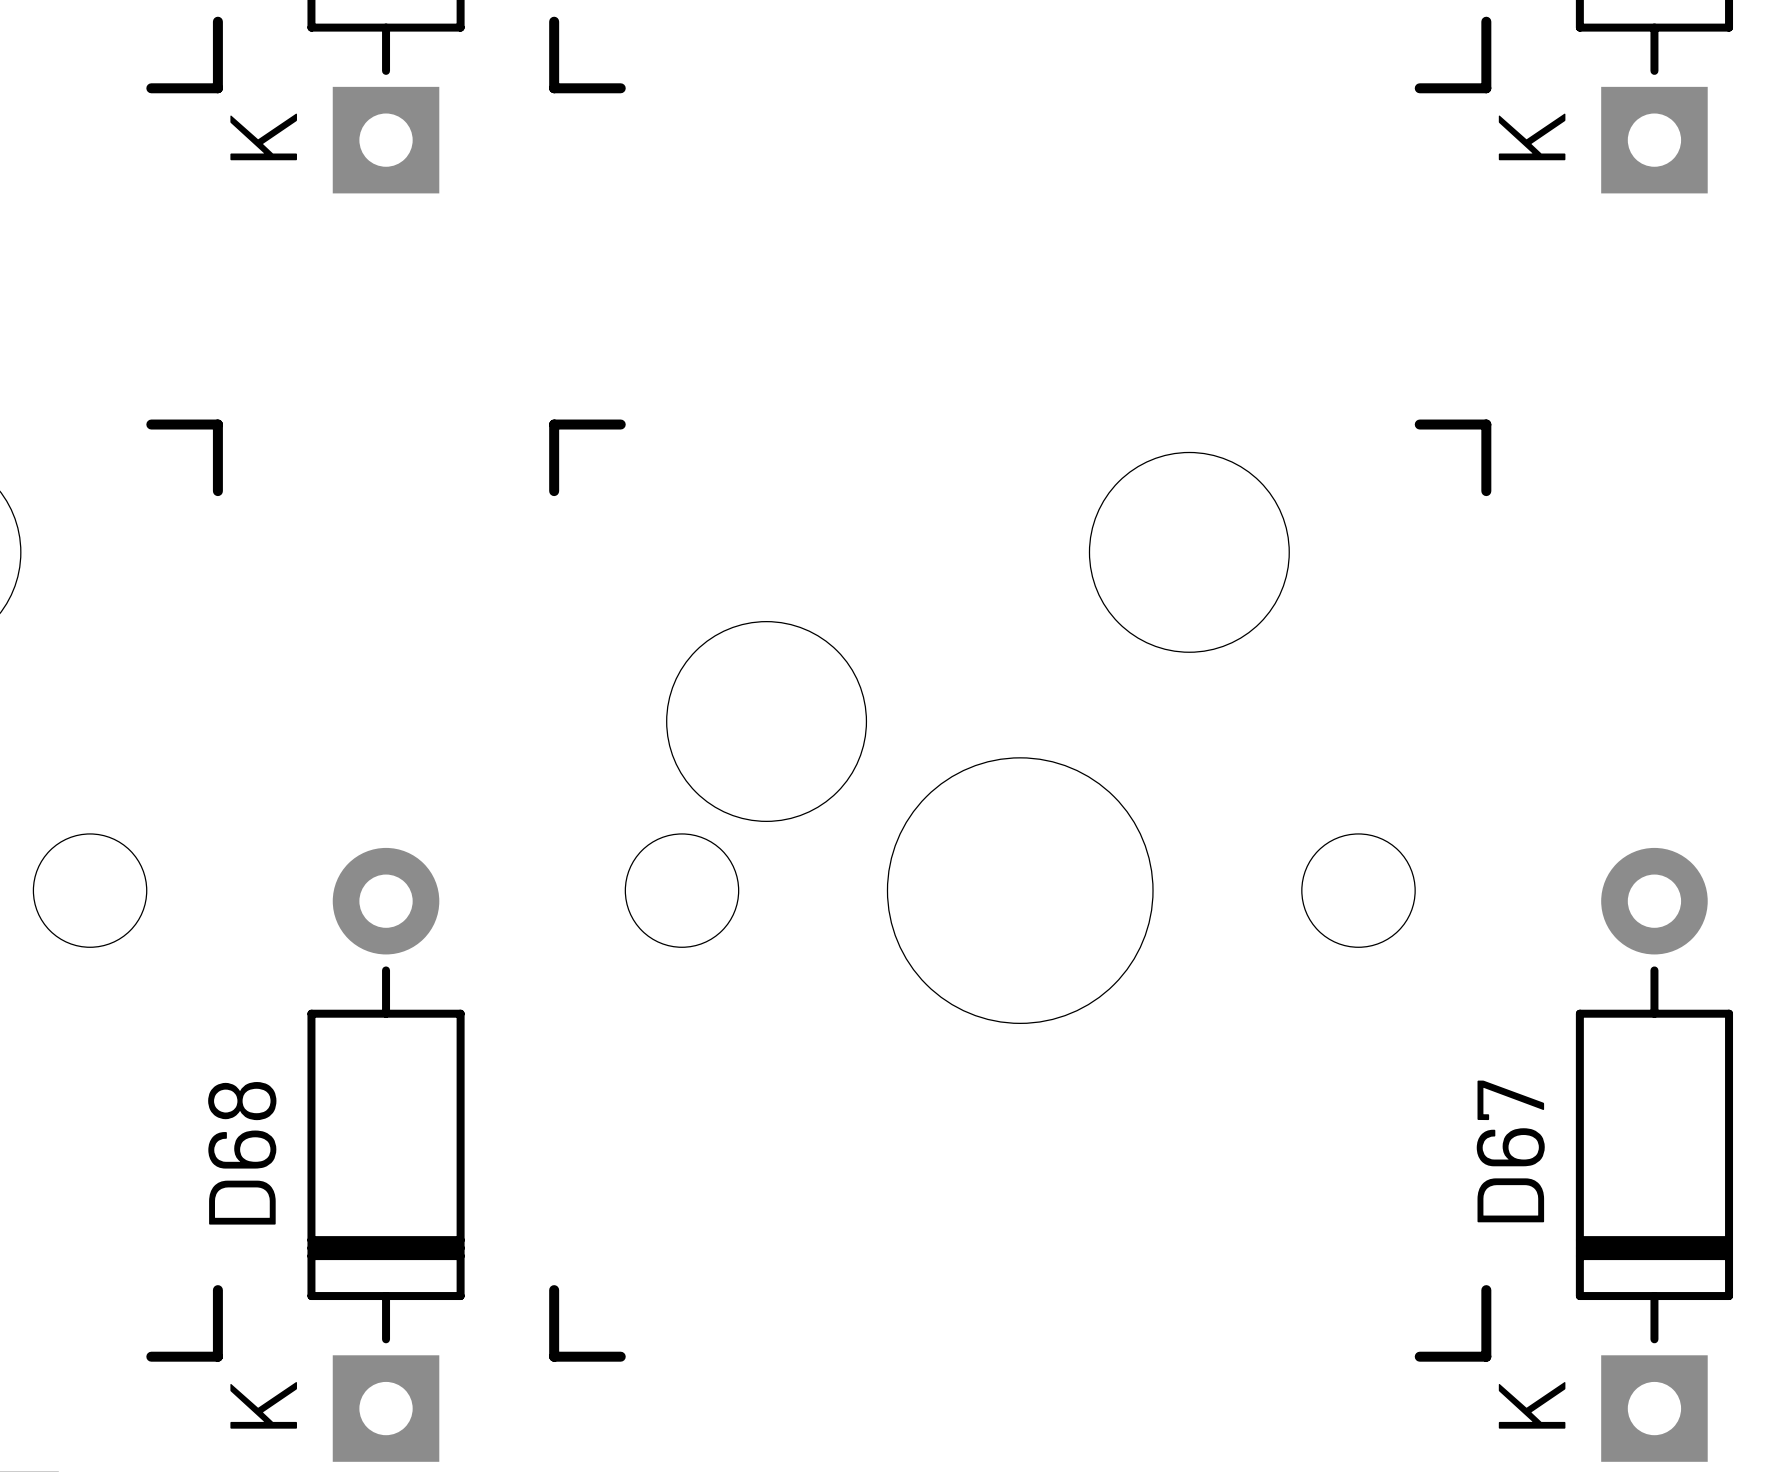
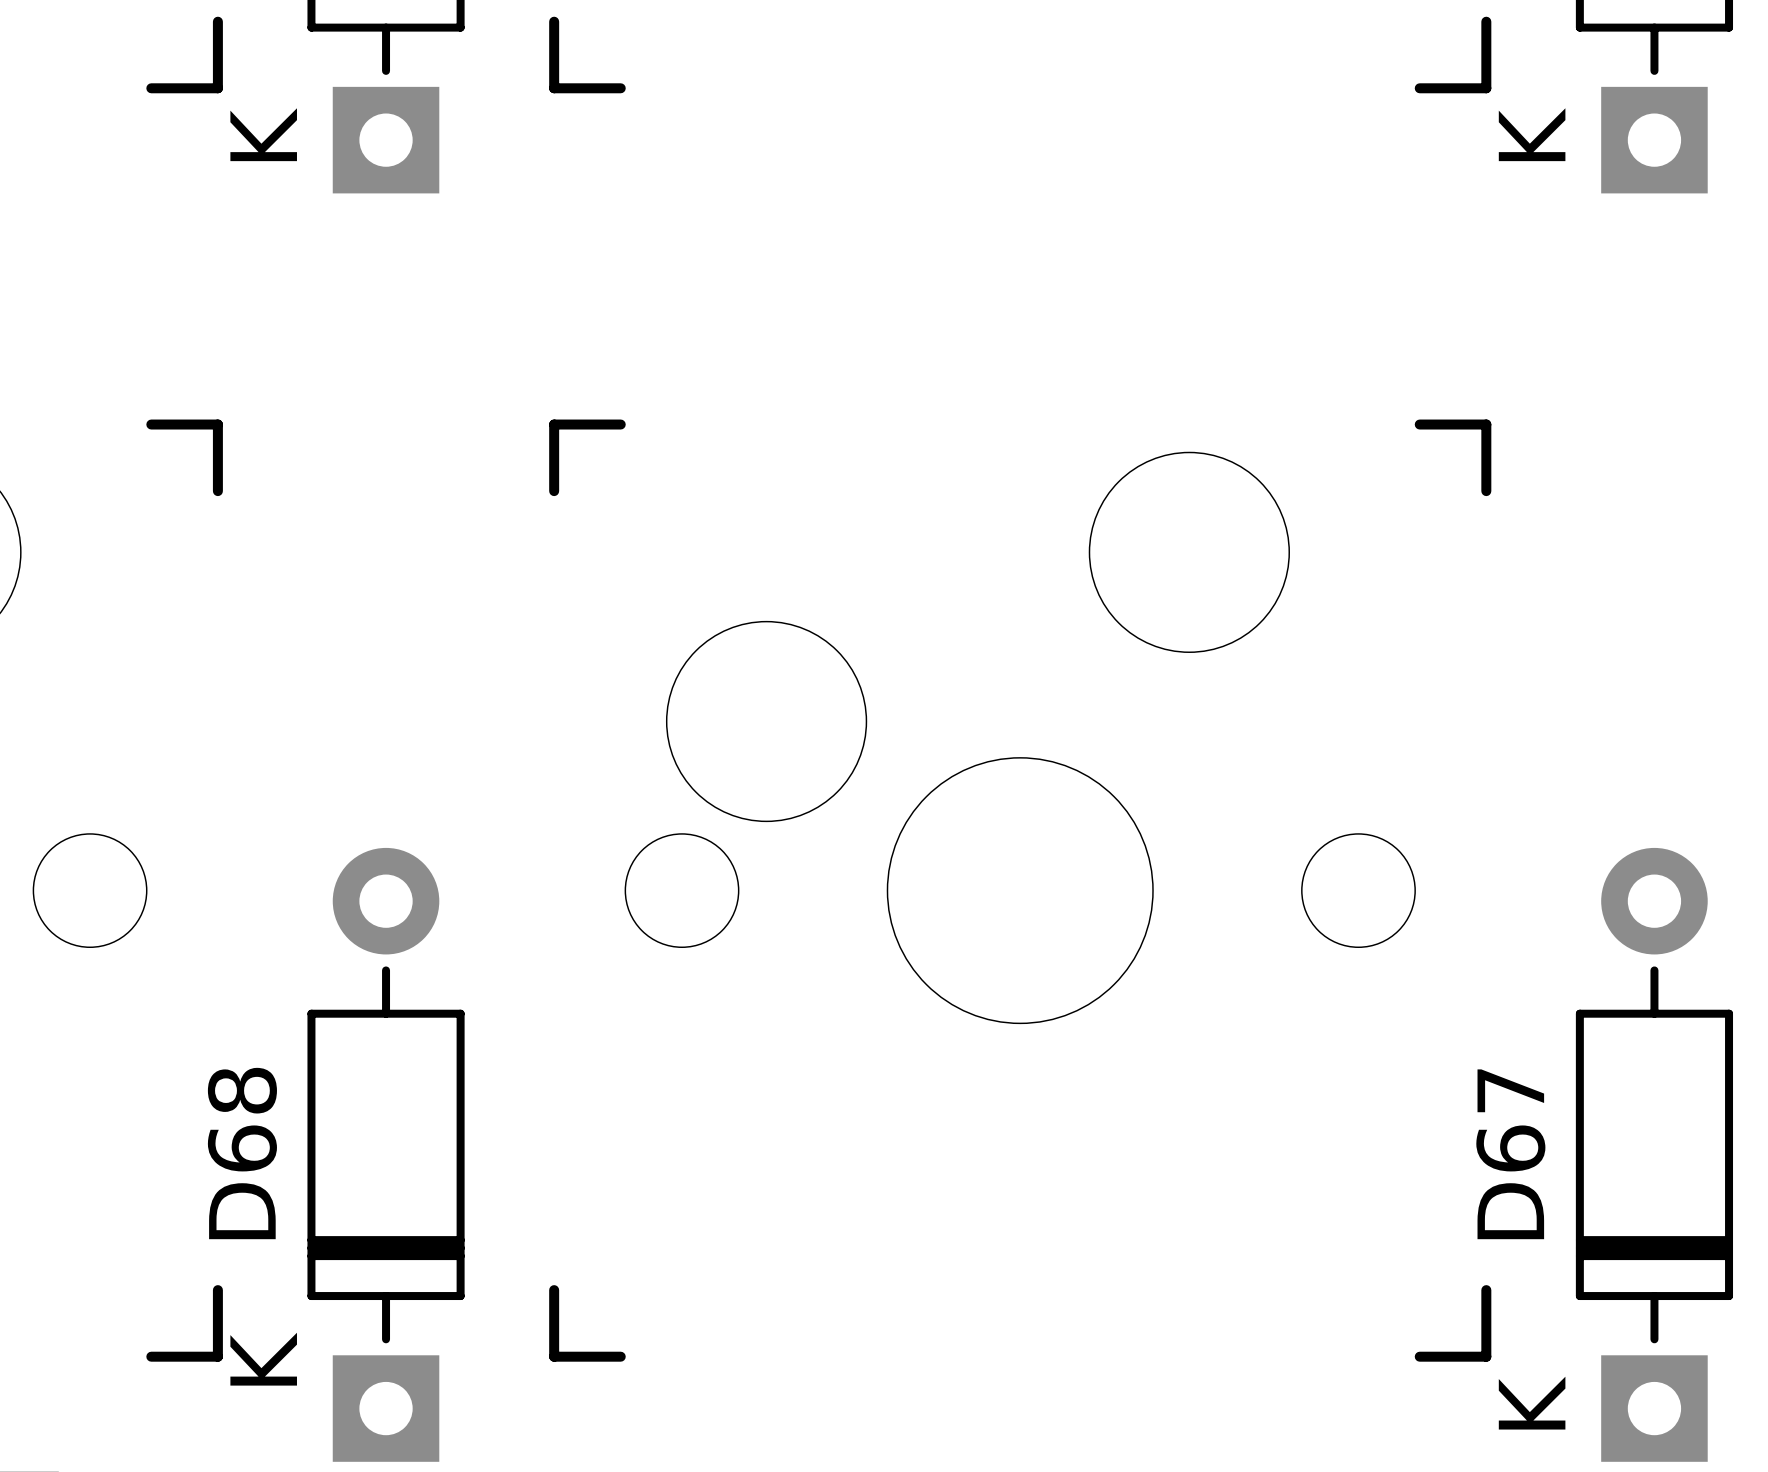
D68 text position: K (263, 1405) -> K (263, 1359)

